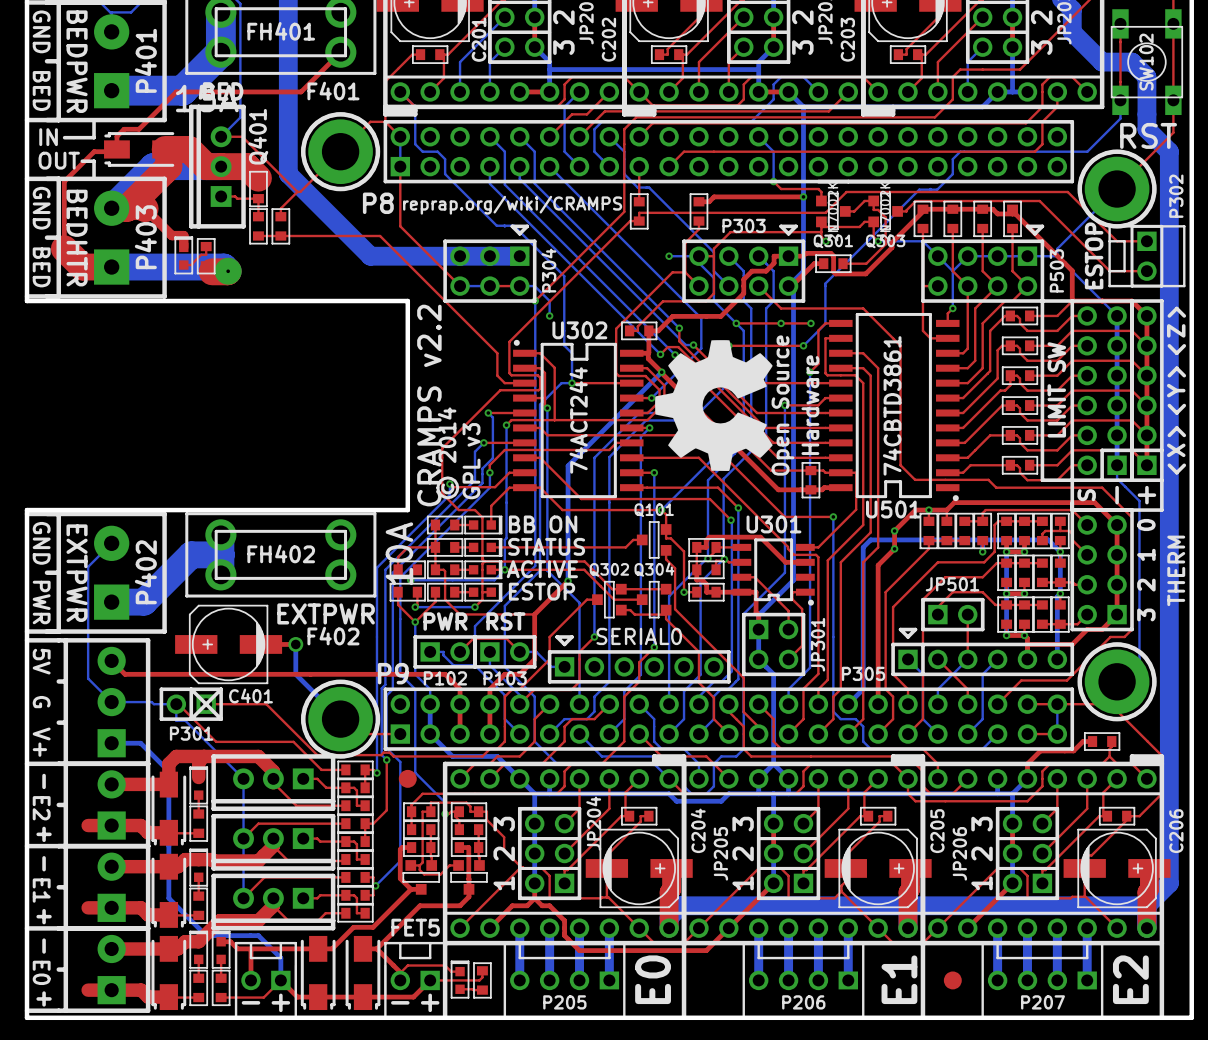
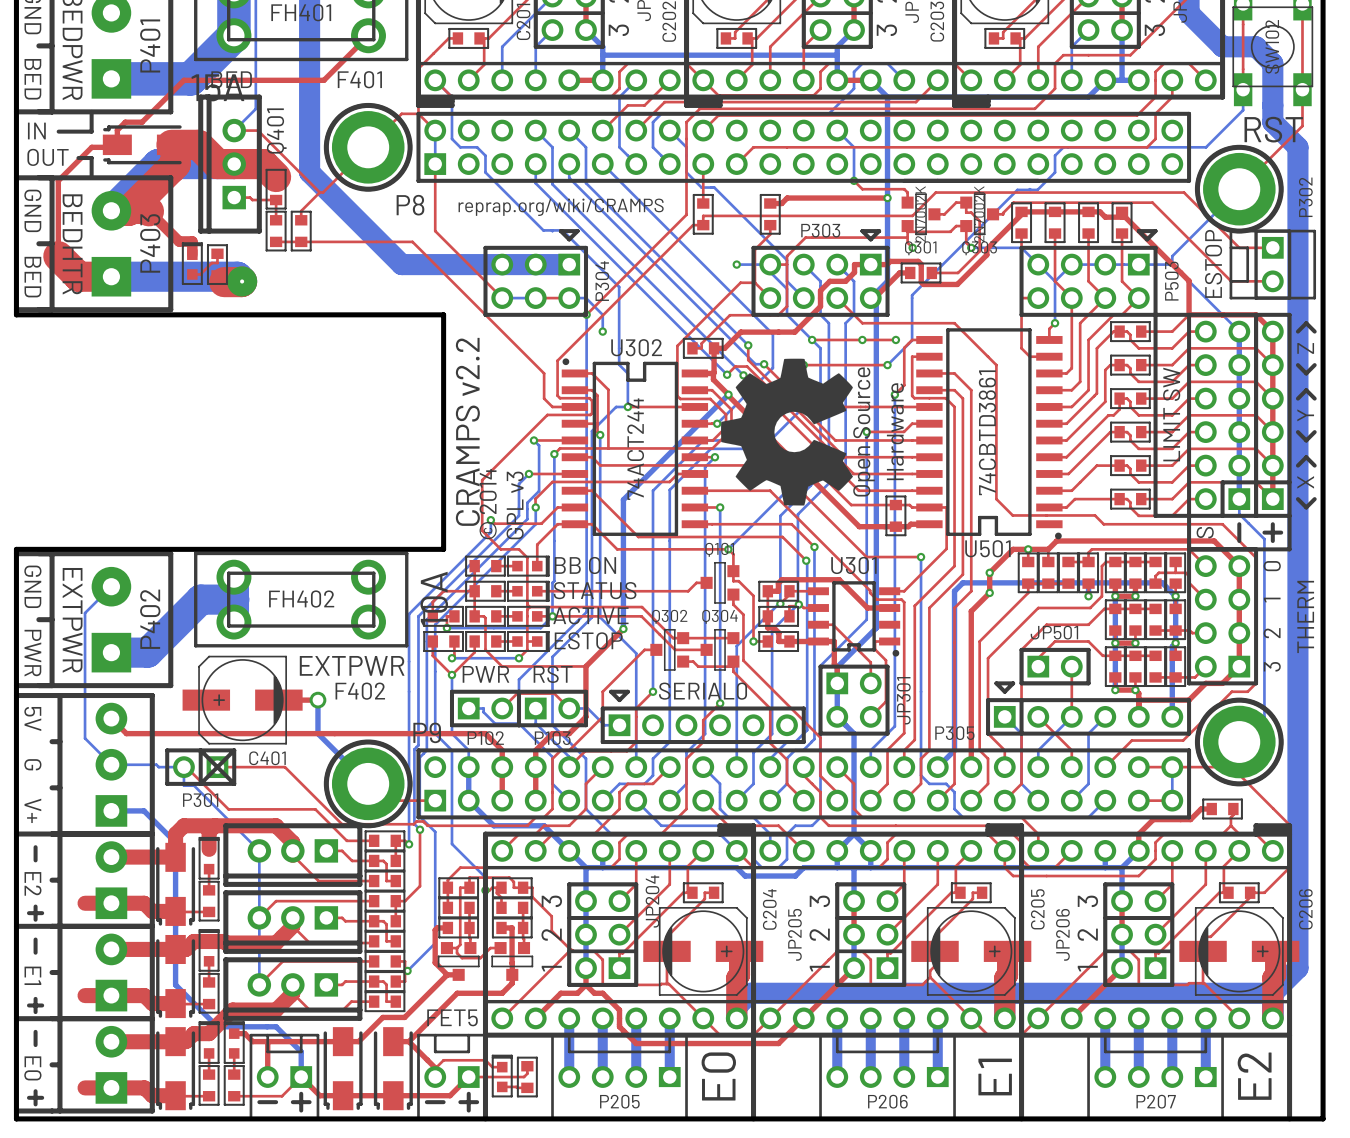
part: (407, 778) -> none
part: (952, 980) -> none

